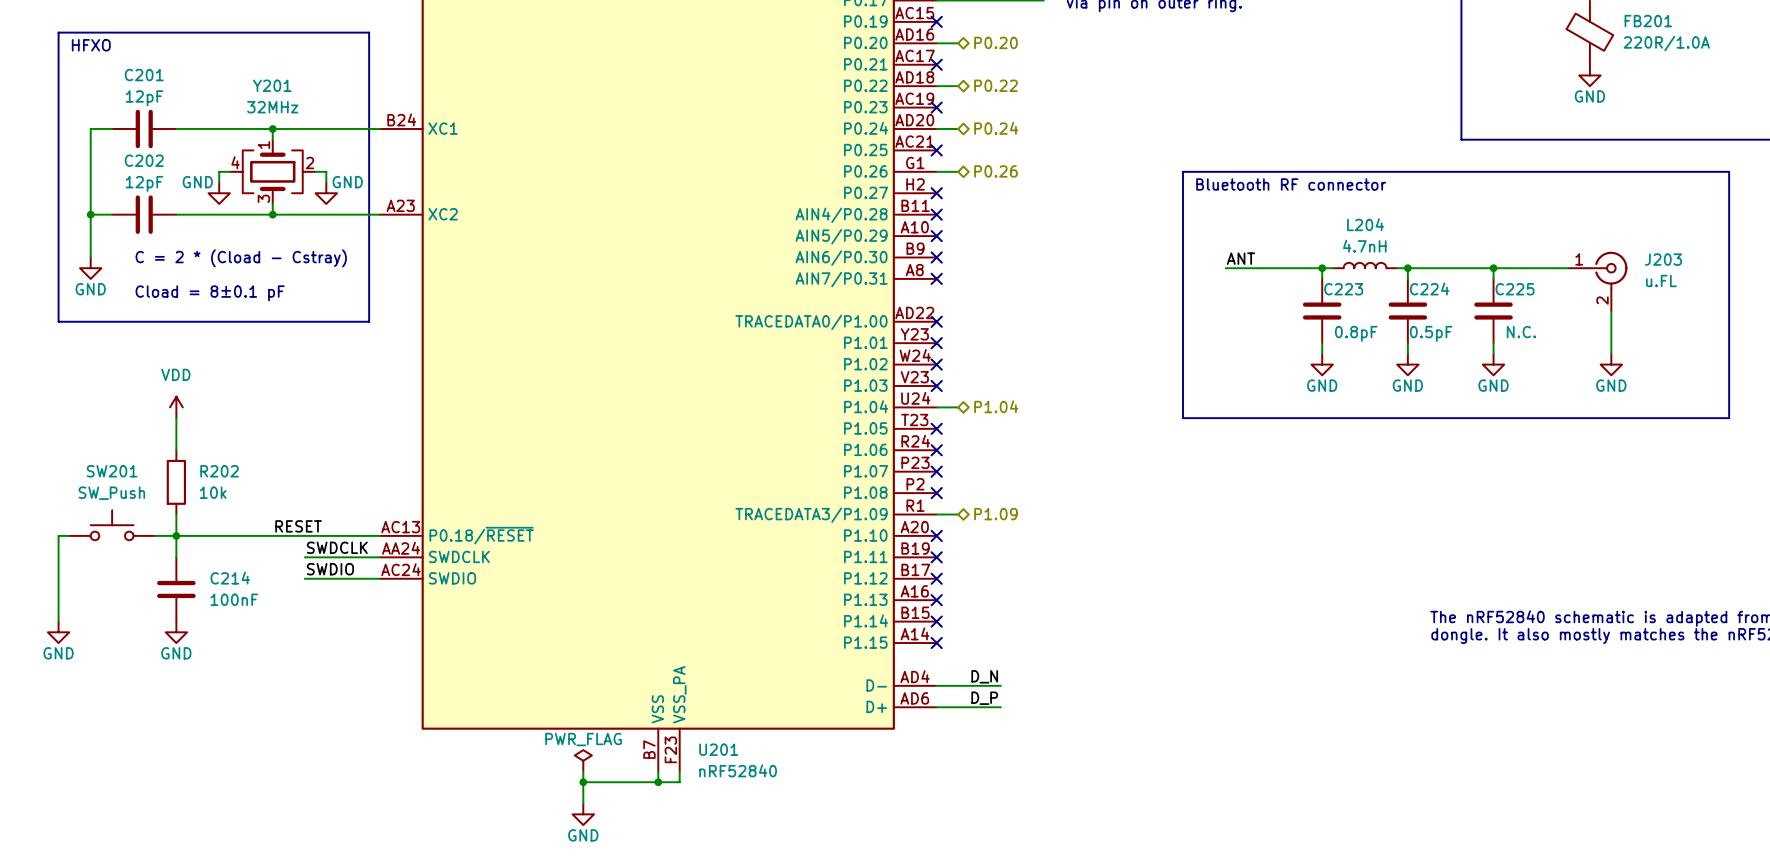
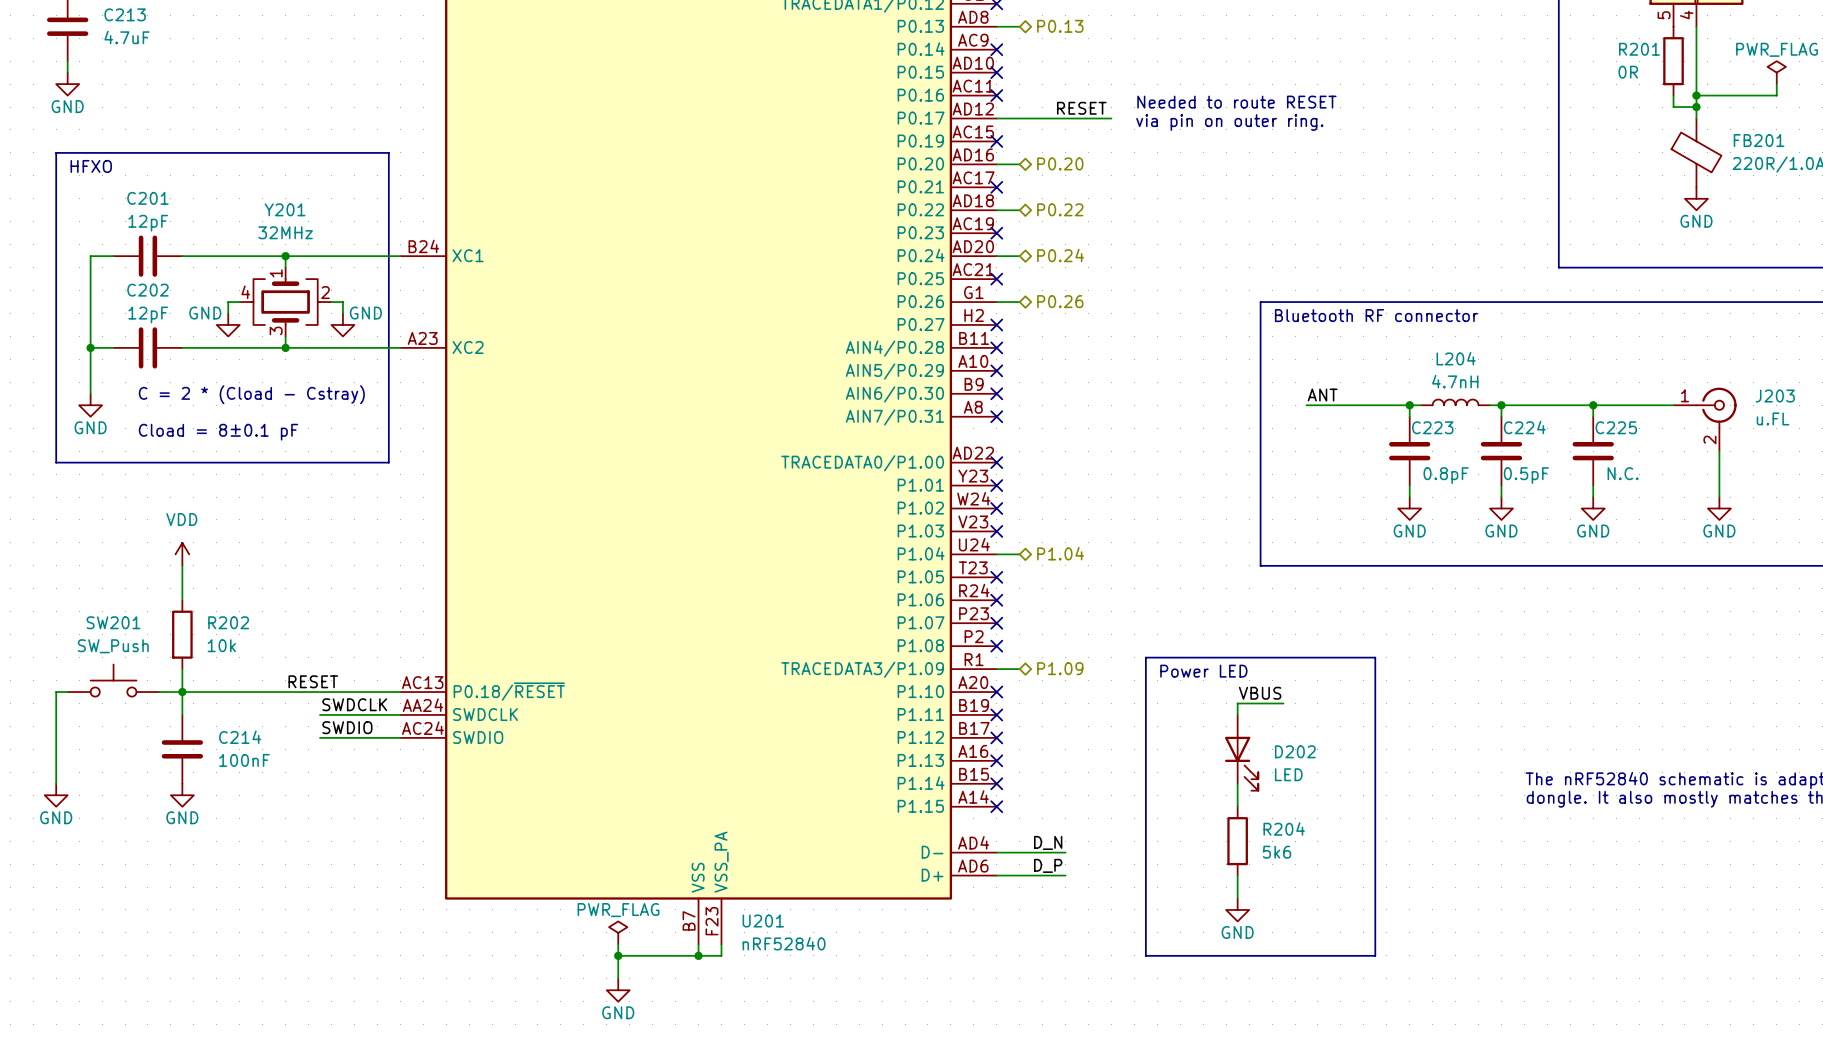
line: none -> (1145, 657) (1145, 955) (1375, 955) (1375, 657) (1145, 657)
text: none -> Power LED (1203, 671)
label: none -> VBUS (1260, 693)
wire: none -> (1283, 703) (1237, 703) (1237, 714)
D202: none -> LED (1241, 752)
wire: none -> (1237, 783) (1237, 806)
R204: none -> 5k6 (1237, 841)
wire: none -> (1237, 875) (1237, 898)
power symbol: none -> GND (1237, 909)

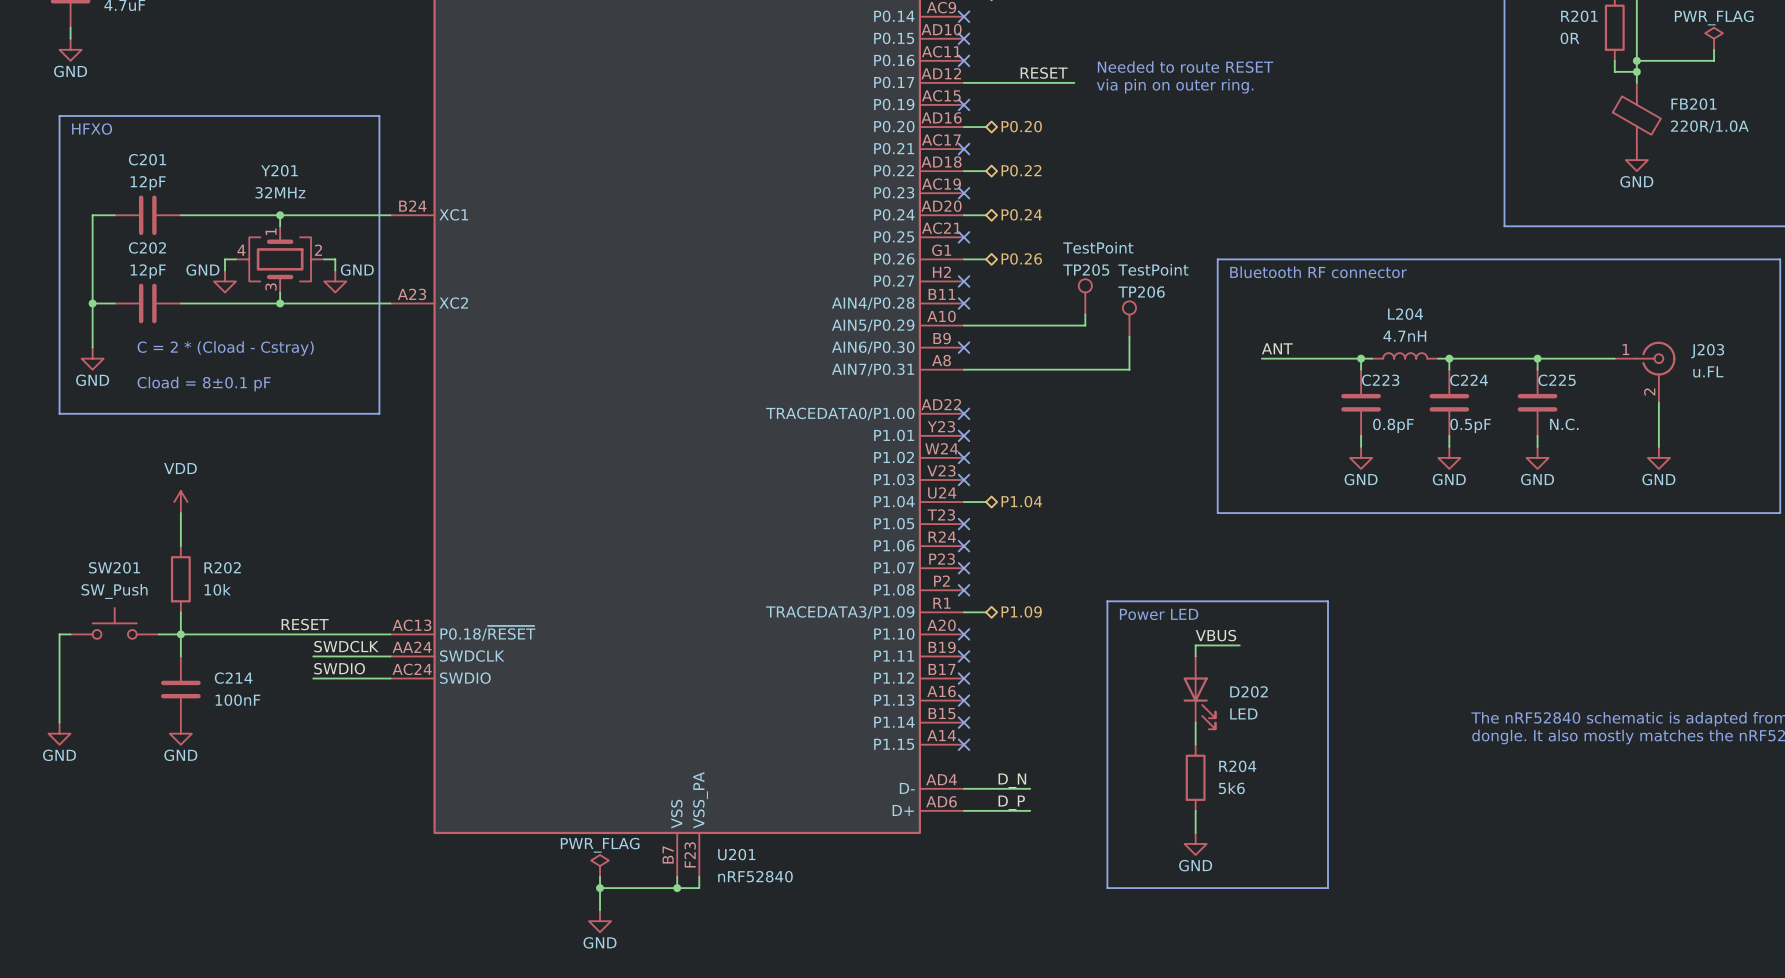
TP205: none -> TestPoint (1085, 296)
wire: none -> (1085, 314) (1085, 325) (964, 325)
TP206: none -> TestPoint (1129, 318)
no-connect mark: (996, 370) -> none
wire: none -> (1129, 336) (1129, 369) (964, 369)
no-connect mark: (996, 416) -> none

